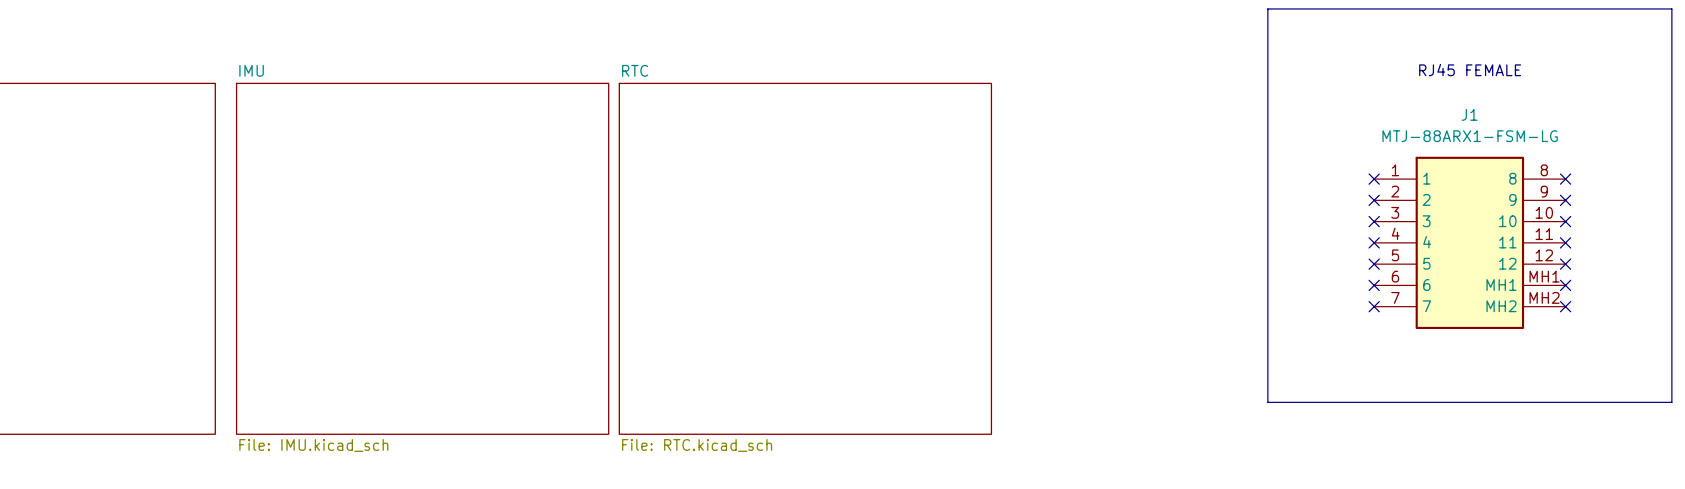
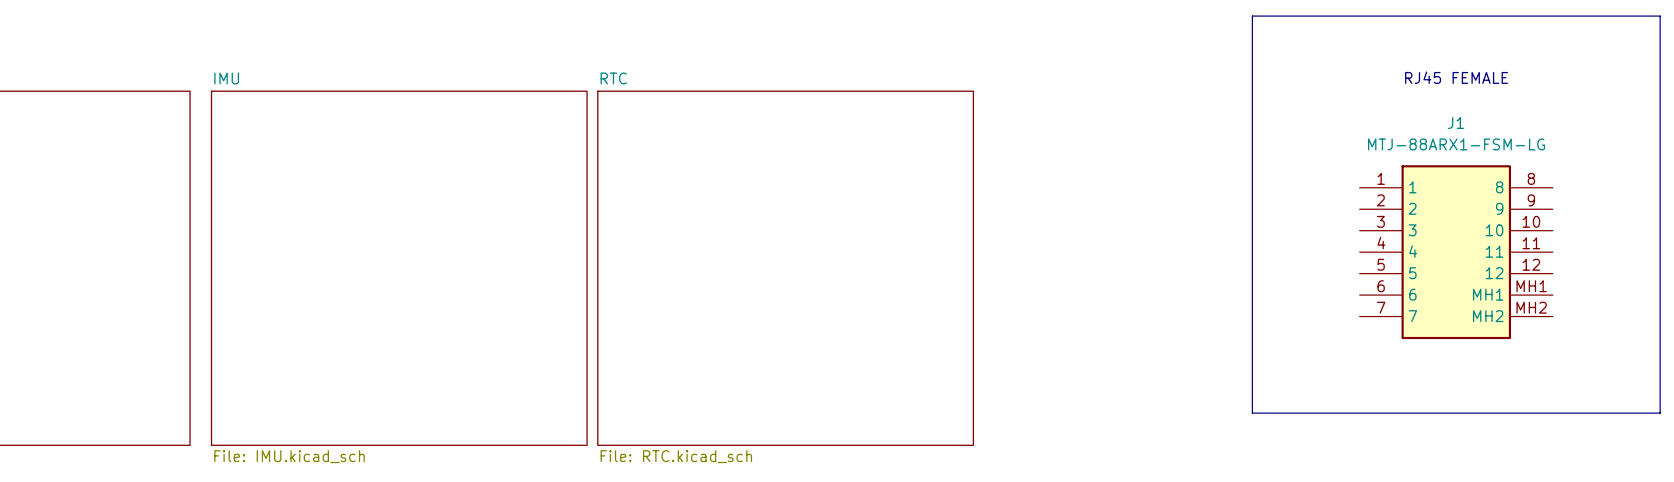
no-connect mark: (1374, 179) -> none
no-connect mark: (1565, 179) -> none
no-connect mark: (1374, 200) -> none
no-connect mark: (1565, 200) -> none
no-connect mark: (1374, 221) -> none
no-connect mark: (1565, 221) -> none
no-connect mark: (1374, 242) -> none
no-connect mark: (1565, 242) -> none
no-connect mark: (1374, 264) -> none
no-connect mark: (1565, 264) -> none
no-connect mark: (1374, 285) -> none
no-connect mark: (1565, 285) -> none
no-connect mark: (1374, 306) -> none
no-connect mark: (1565, 306) -> none

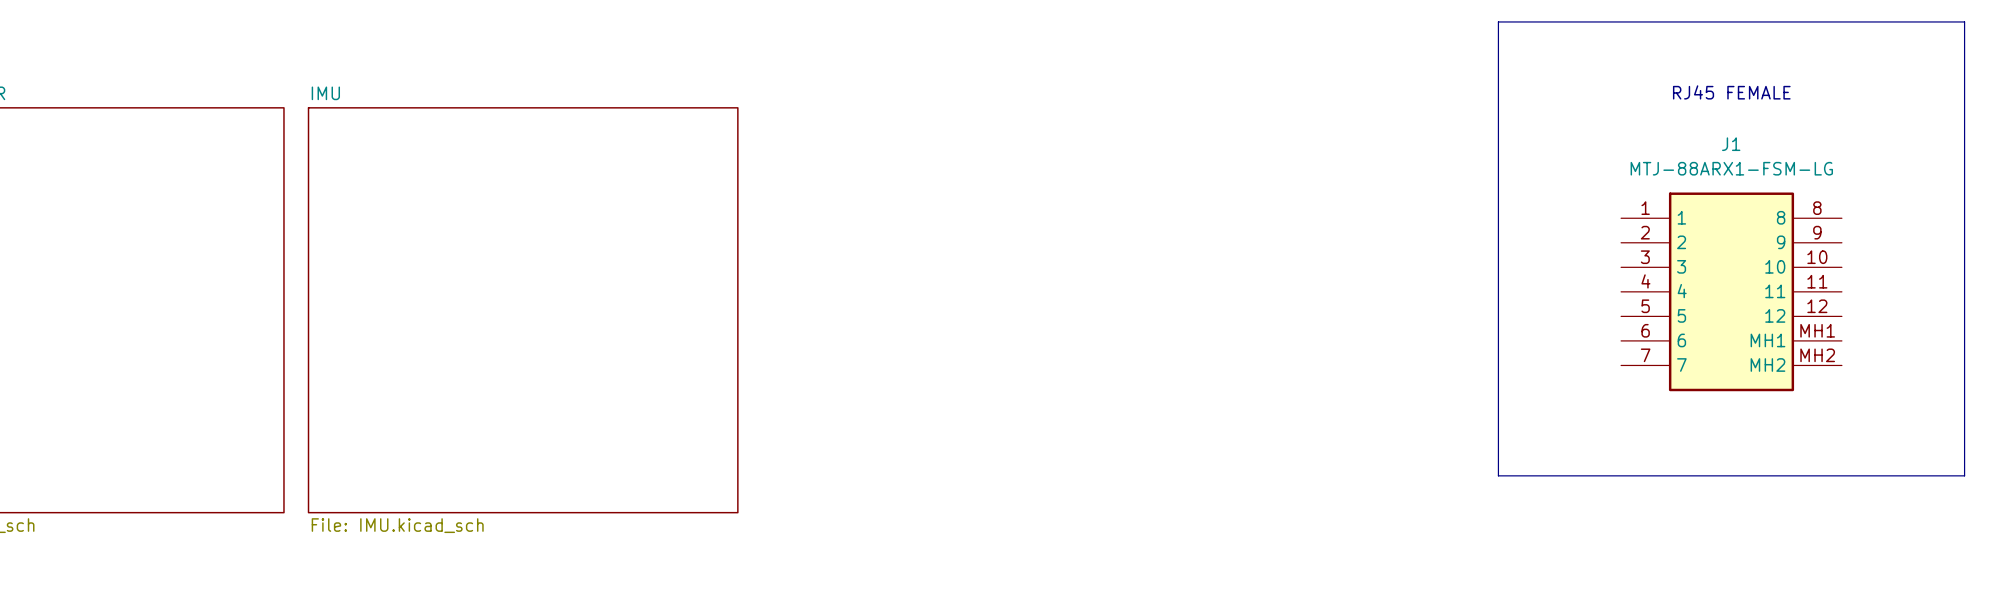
sheet RTC: File: RTC.kicad_sch (785, 268) -> none

